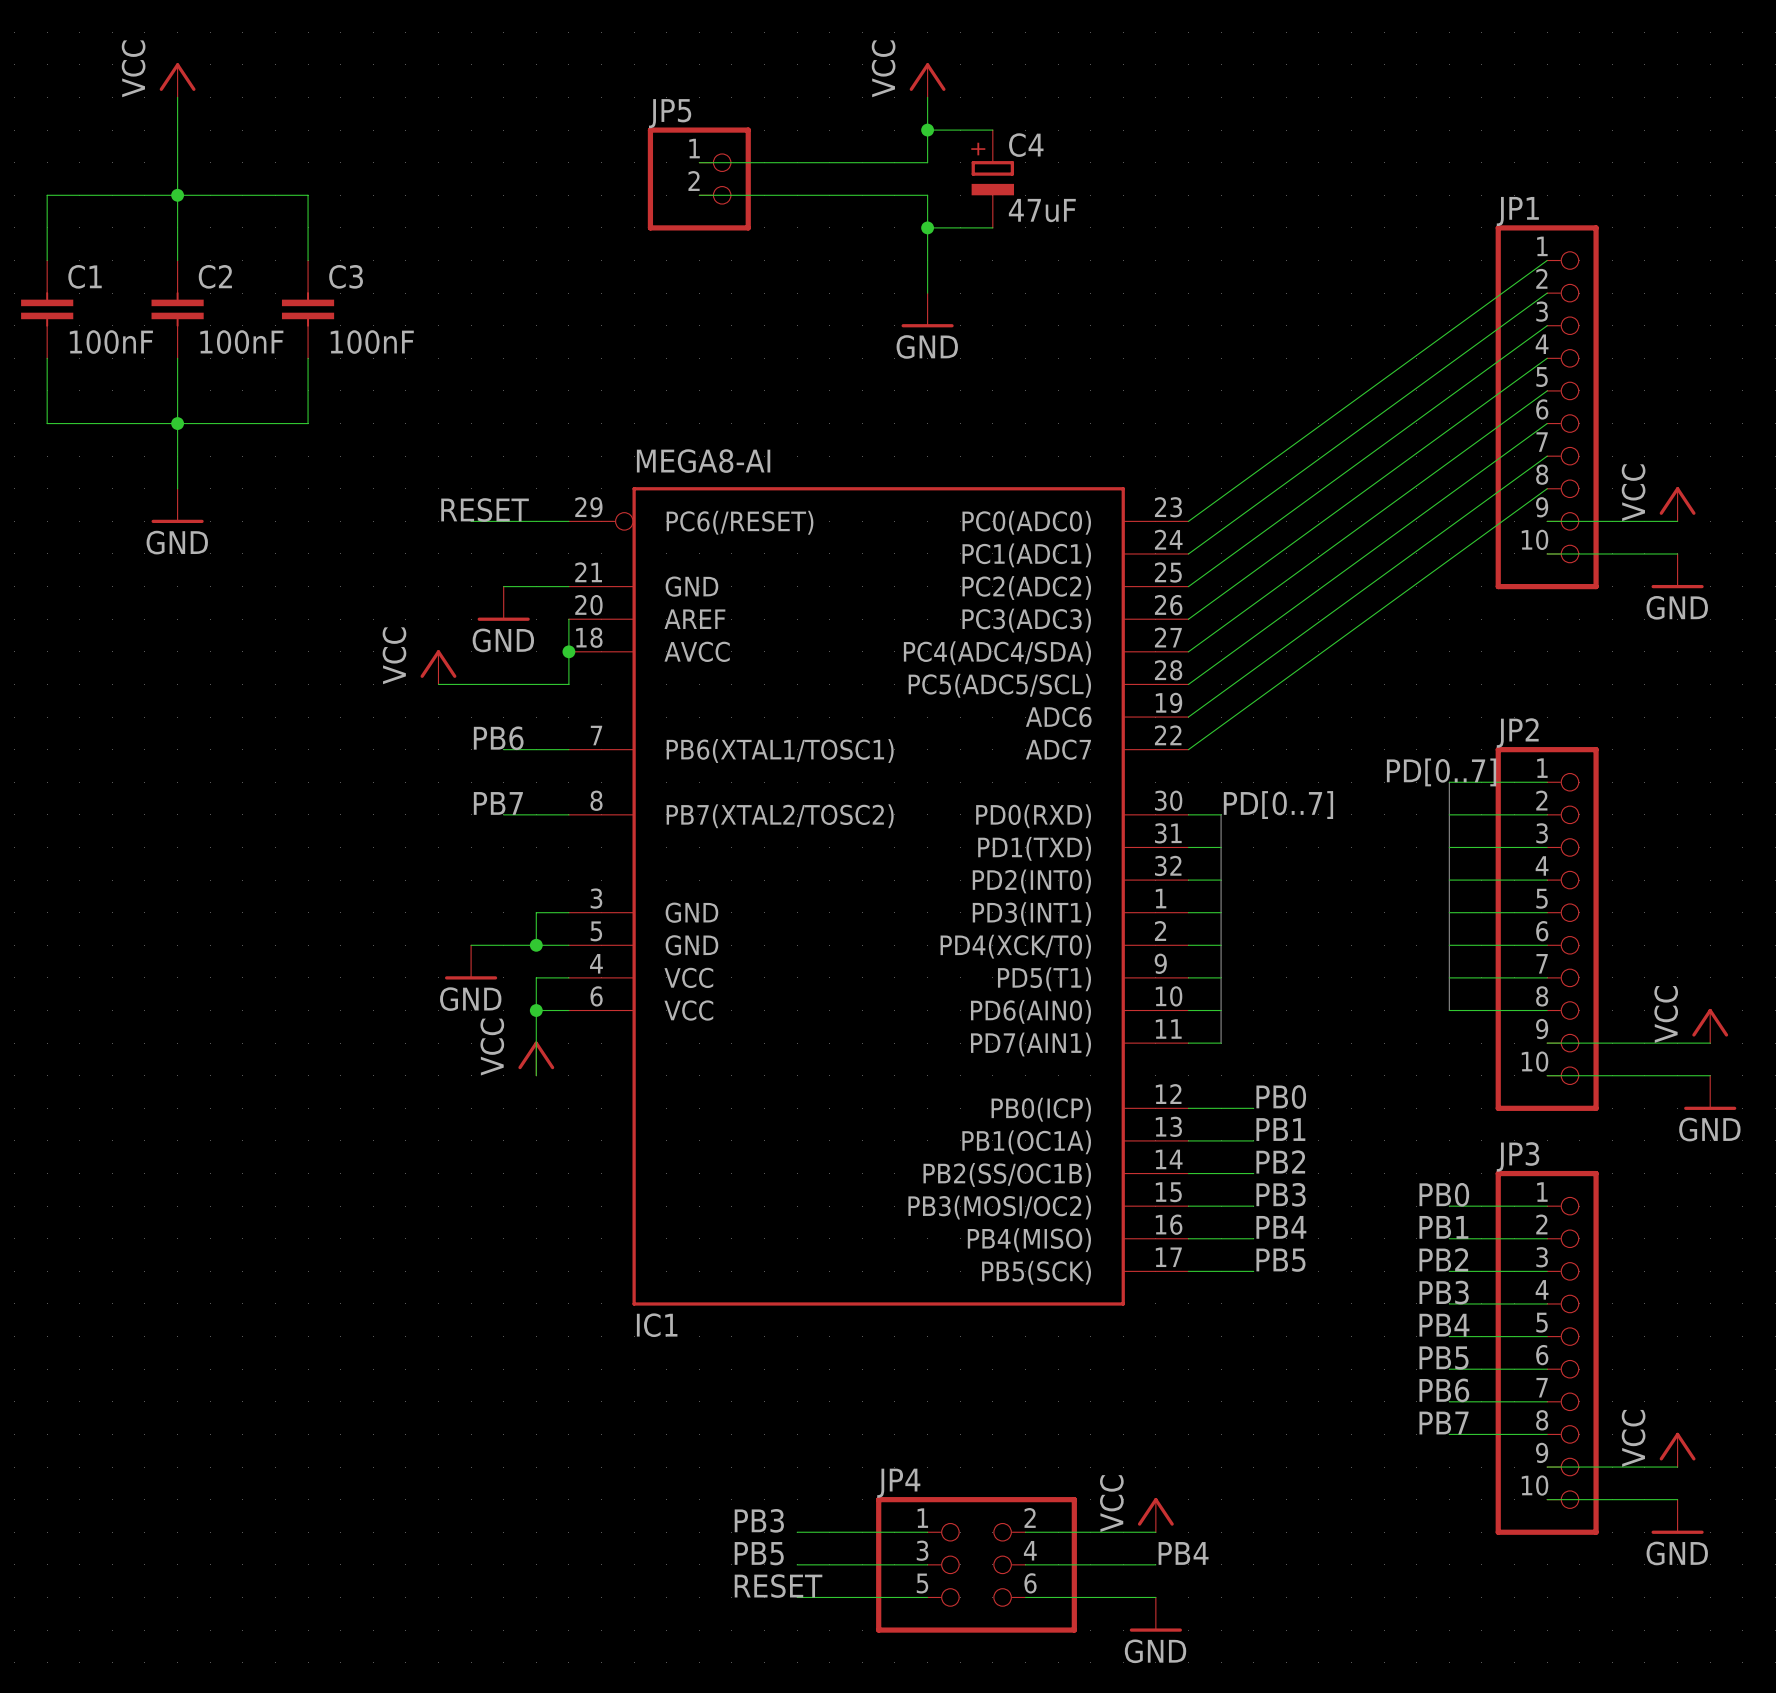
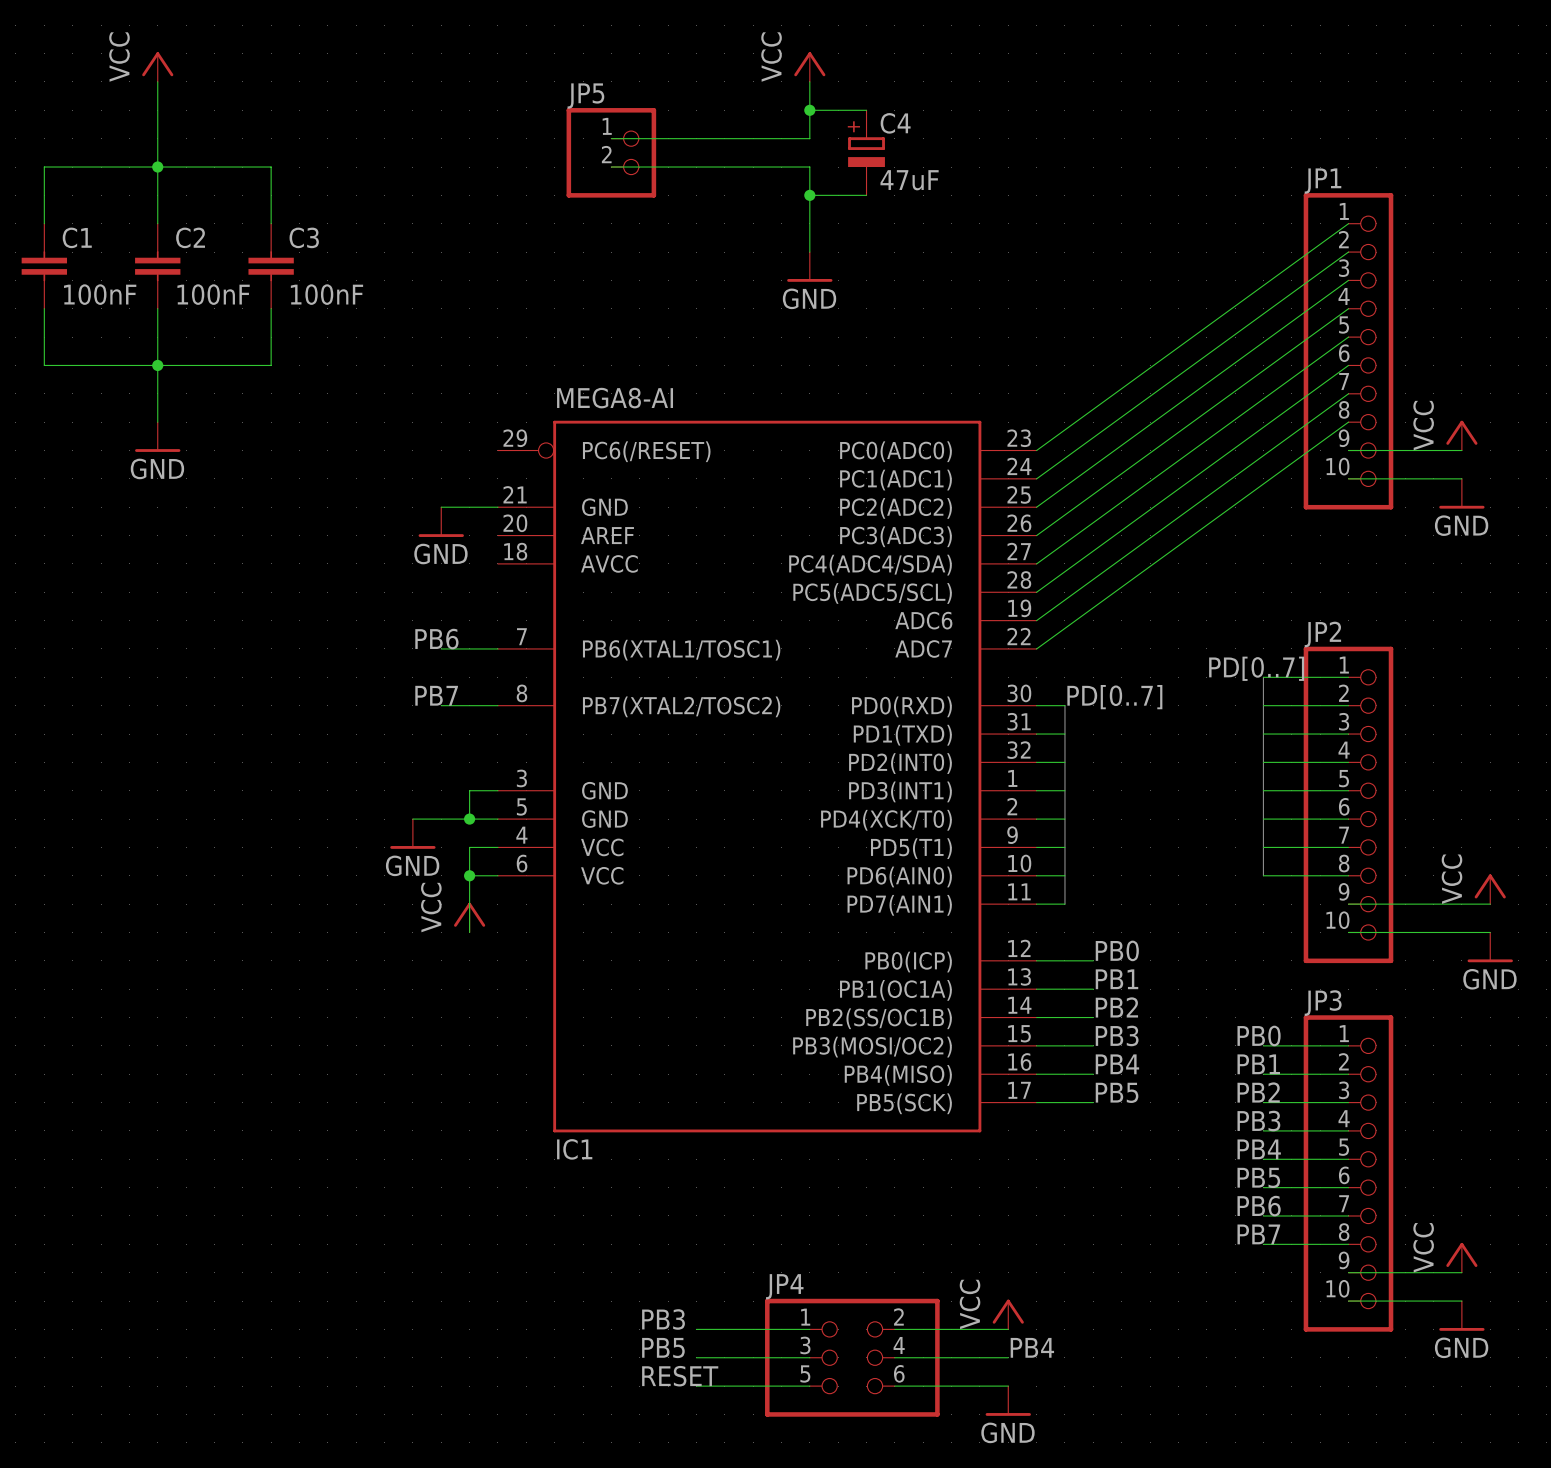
label: RESET (485, 509) -> none
wire: (471, 521) (568, 521) -> none
wire: (568, 619) (568, 684) (438, 684) -> none
junction: (568, 651) -> none
power symbol: VCC (438, 667) -> none

